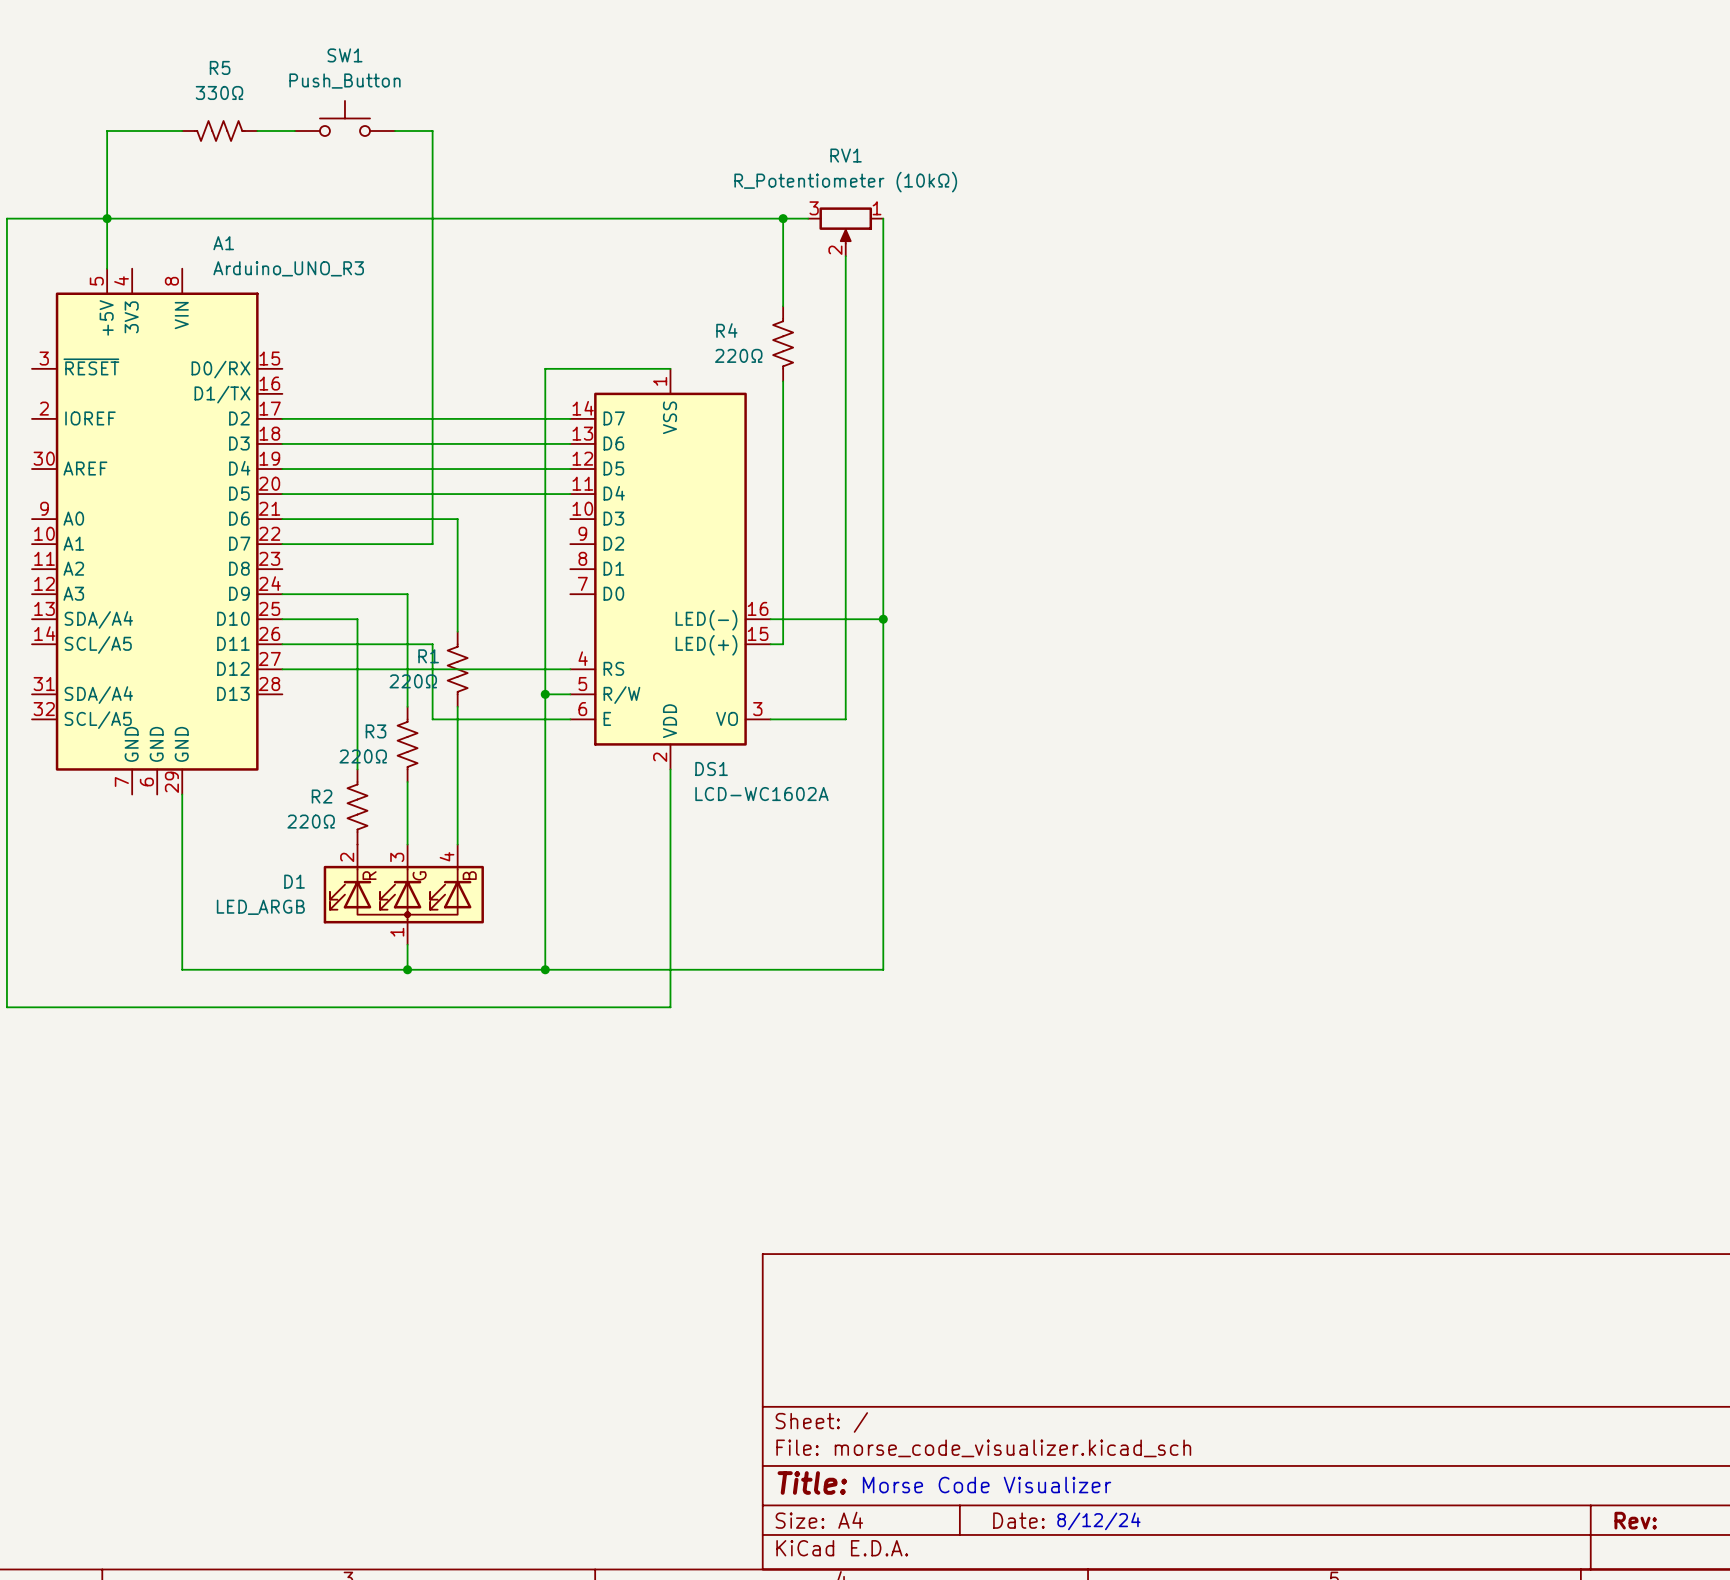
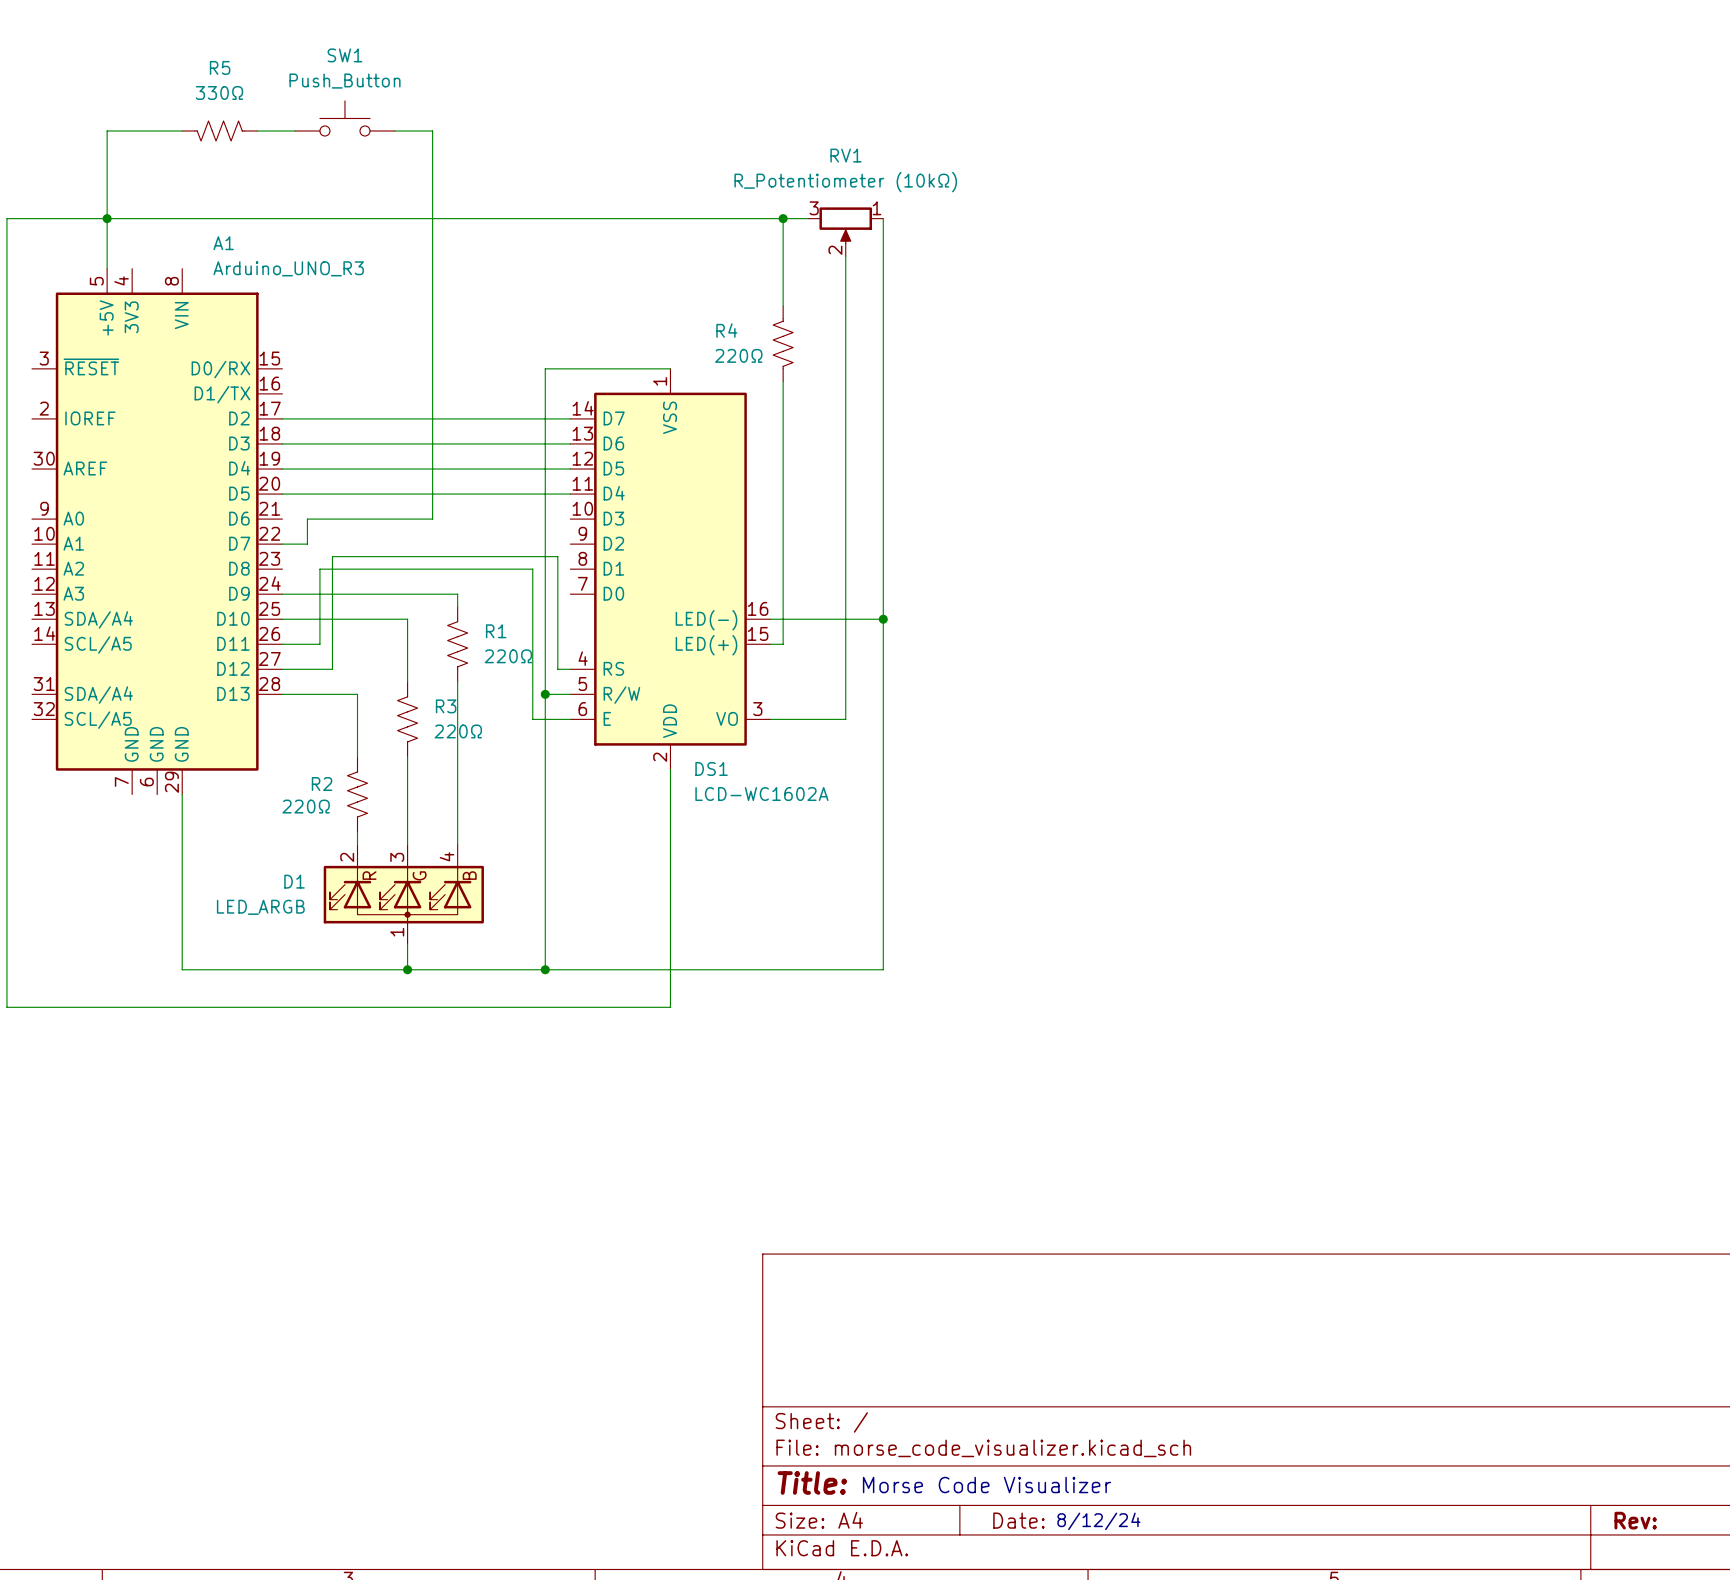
wire: (282, 519) (307, 519) -> (307, 544) (307, 519)
wire: (307, 544) (432, 544) (432, 519) (457, 519) (457, 594) -> none
wire: (407, 594) (407, 619) -> (407, 594) (457, 594)
wire: (357, 619) (357, 694) -> (357, 619) (407, 619)
wire: (319, 644) (432, 644) (432, 719) (532, 719) -> (319, 644) (319, 569) (532, 569) (532, 719)
R1 name position: R1 (428, 656) -> R1 (496, 631)
wire: (332, 669) (557, 669) -> (332, 669) (332, 556) (557, 556) (557, 669)
R1 position: (457, 669) -> (457, 644)
R1 value position: 220Ω (413, 681) -> 220Ω (508, 656)
wire: none -> (282, 694) (357, 694)
R3 name position: R3 (376, 731) -> R3 (446, 706)
R3 position: (407, 744) -> (407, 719)
R3 value position: 220Ω (363, 756) -> 220Ω (458, 731)
R2 position: (357, 807) -> (357, 794)
R2 value position: 220Ω (311, 821) -> 220Ω (306, 806)

